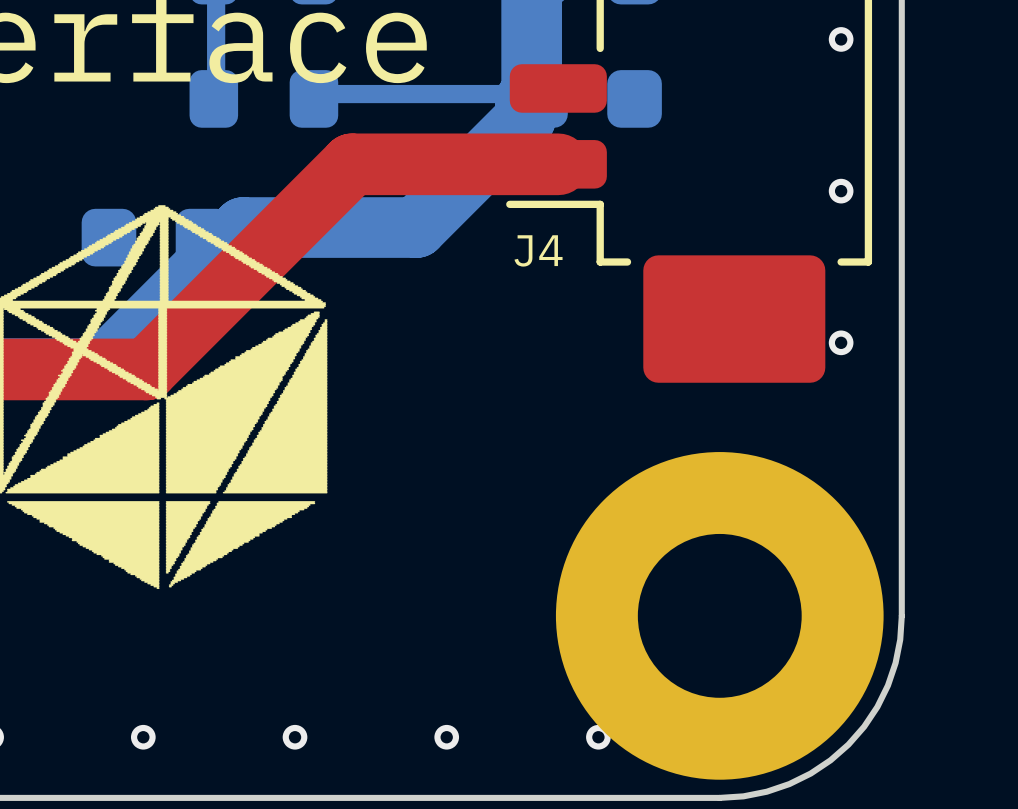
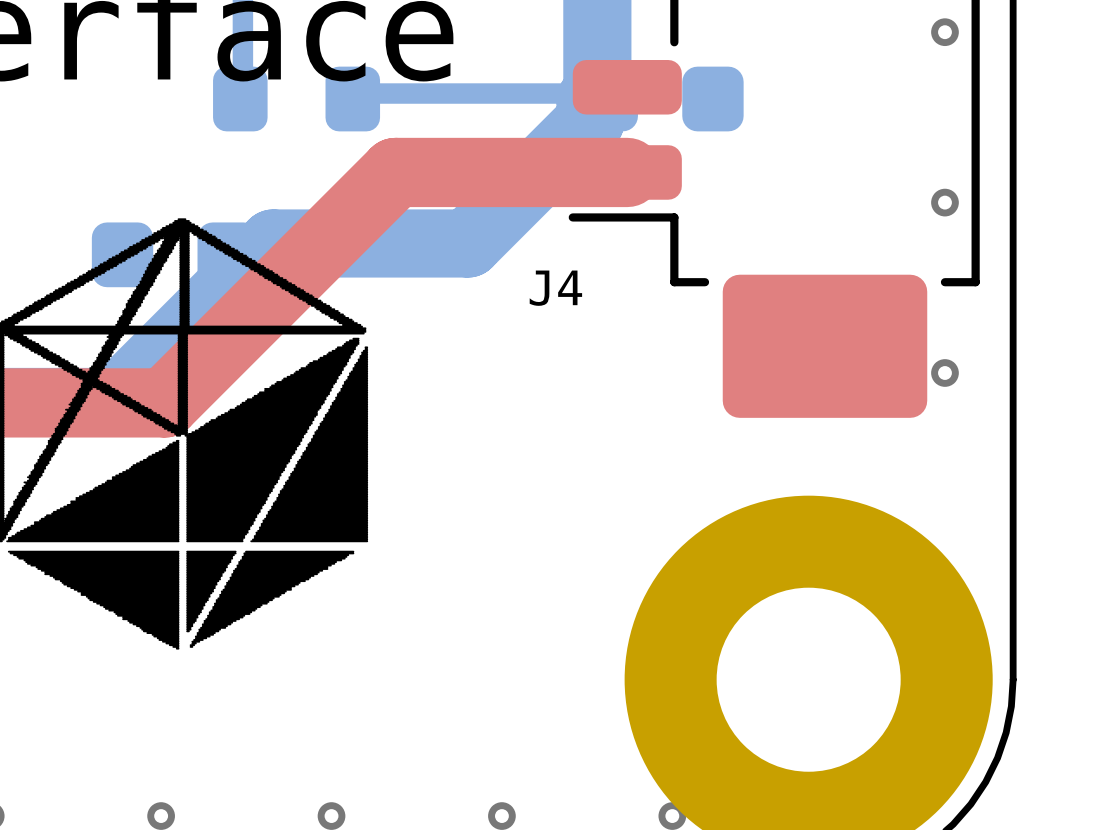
J4 name position: J4 (538, 250) -> J4 (555, 288)

